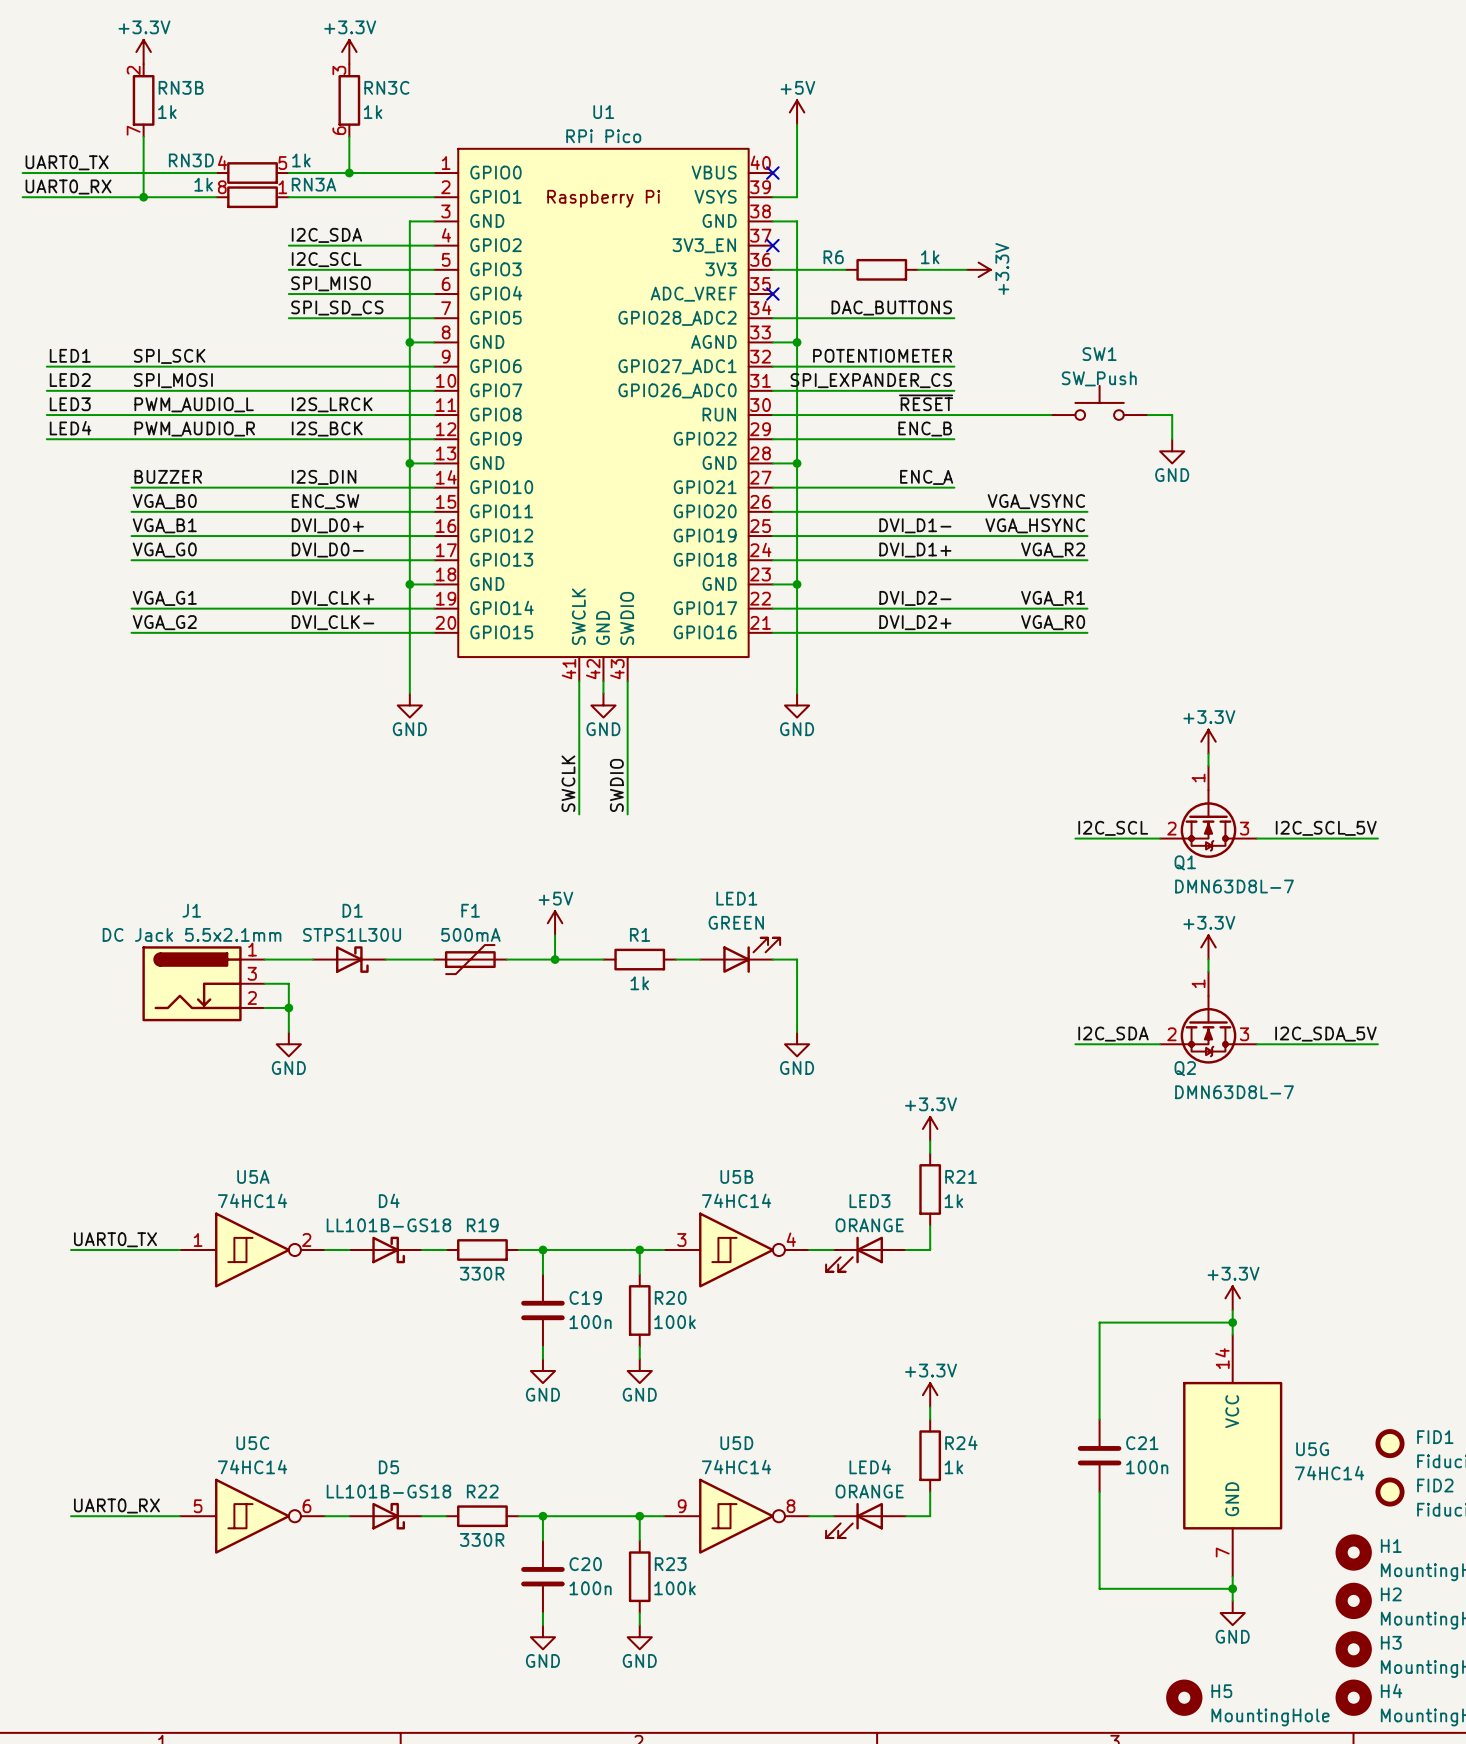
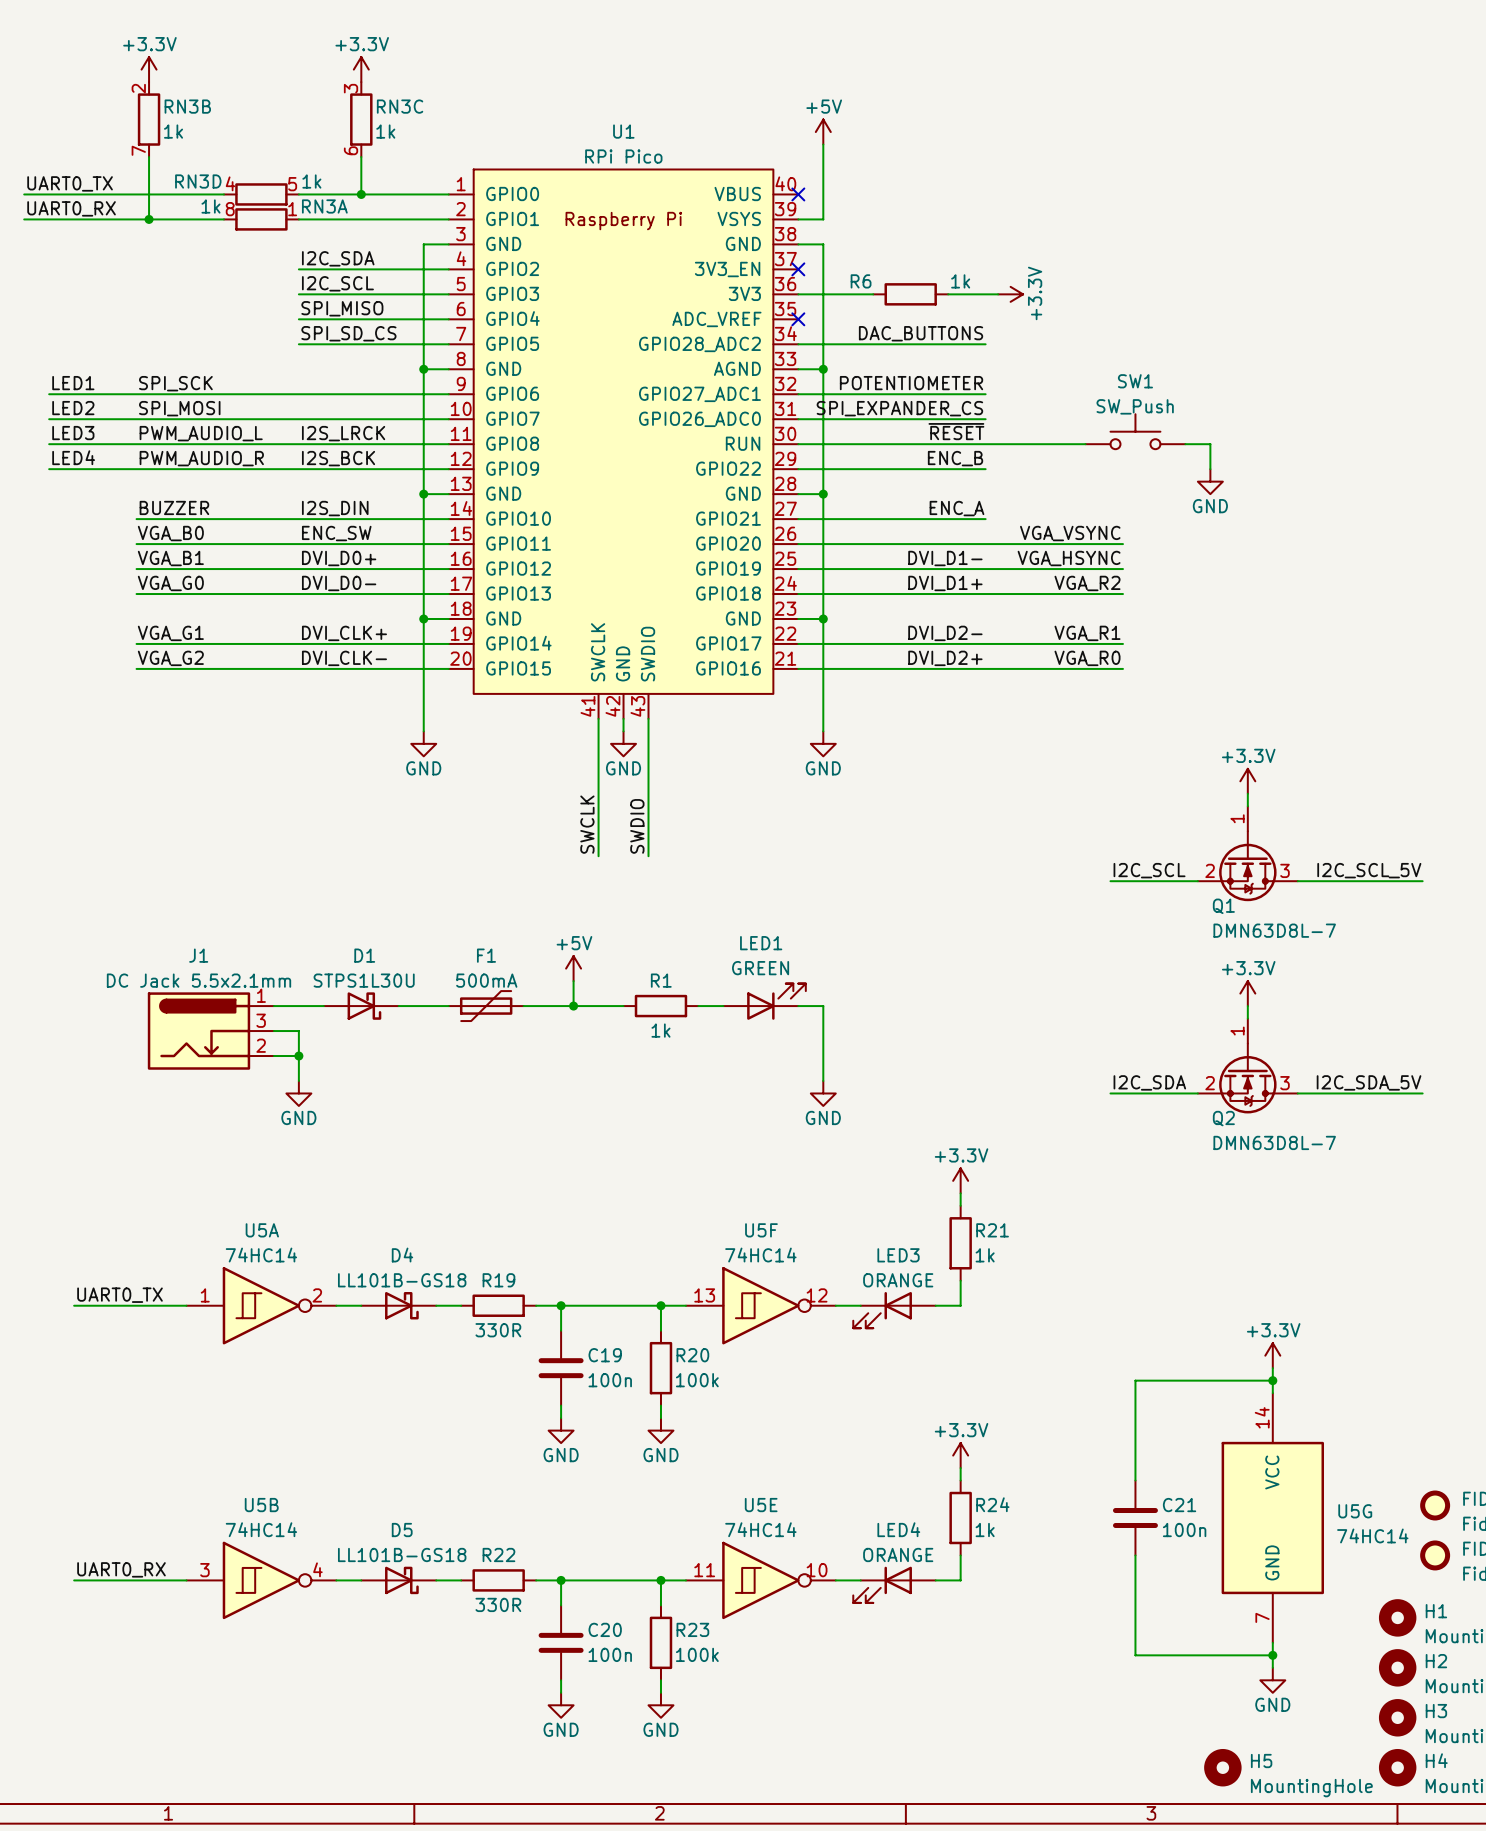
U5B position: (736, 1249) -> (261, 1580)
U5F: none -> 74HC14 (760, 1305)
U5D name: U5D (736, 1443) -> U5E (761, 1505)
U5D pin number: 9 (682, 1506) -> 11 (704, 1570)
U5D pin number: 8 (791, 1506) -> 10 (817, 1570)
U5C: 74HC14 (252, 1516) -> none

